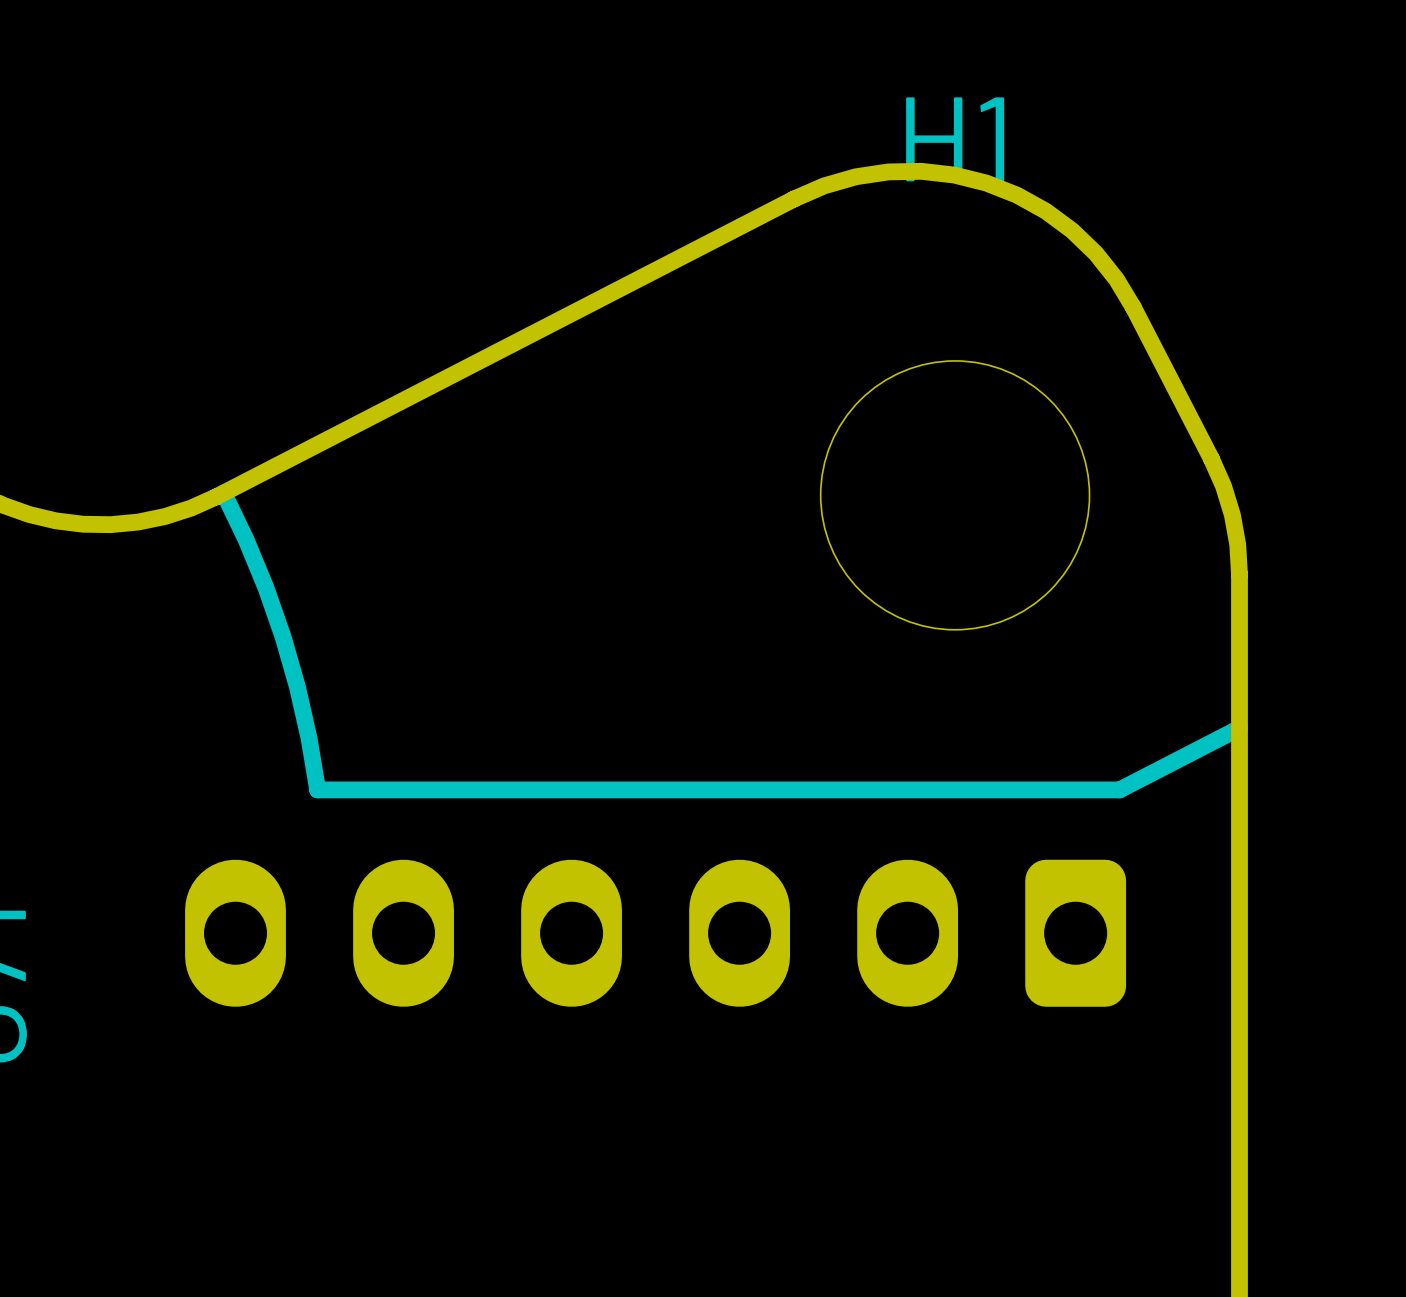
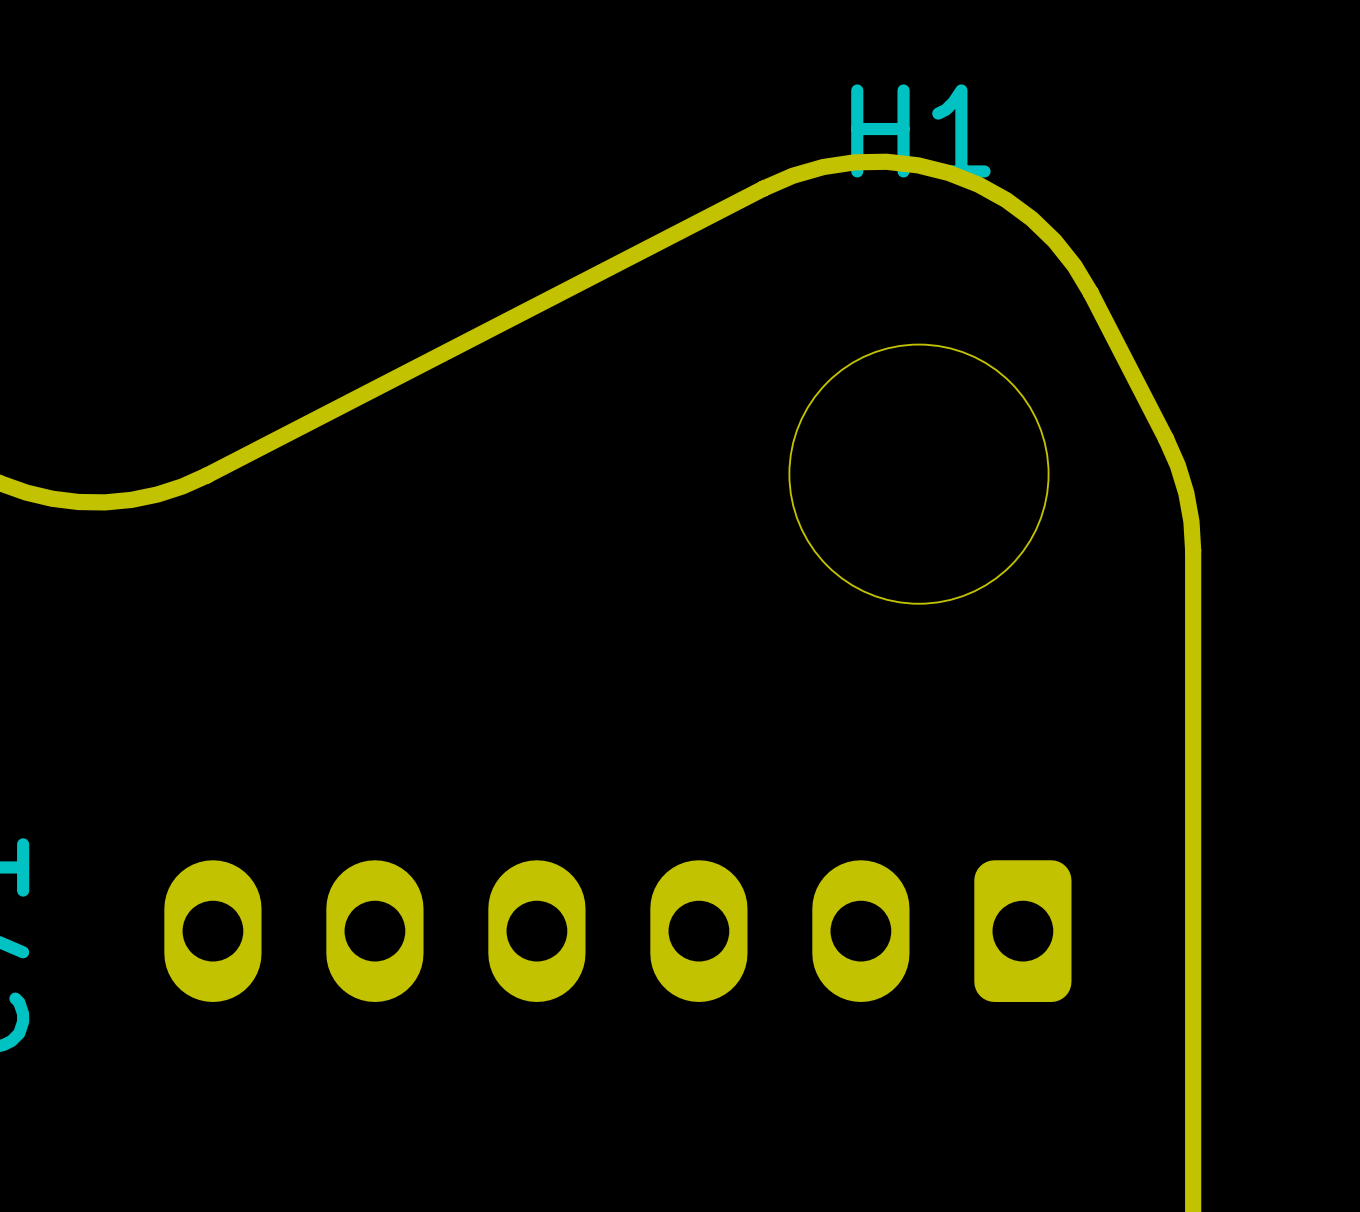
line: (223, 493) (246, 540) (283, 637) (309, 738) (317, 789) (1119, 789) (1239, 728) -> none
part position: (655, 933) -> (617, 931)

